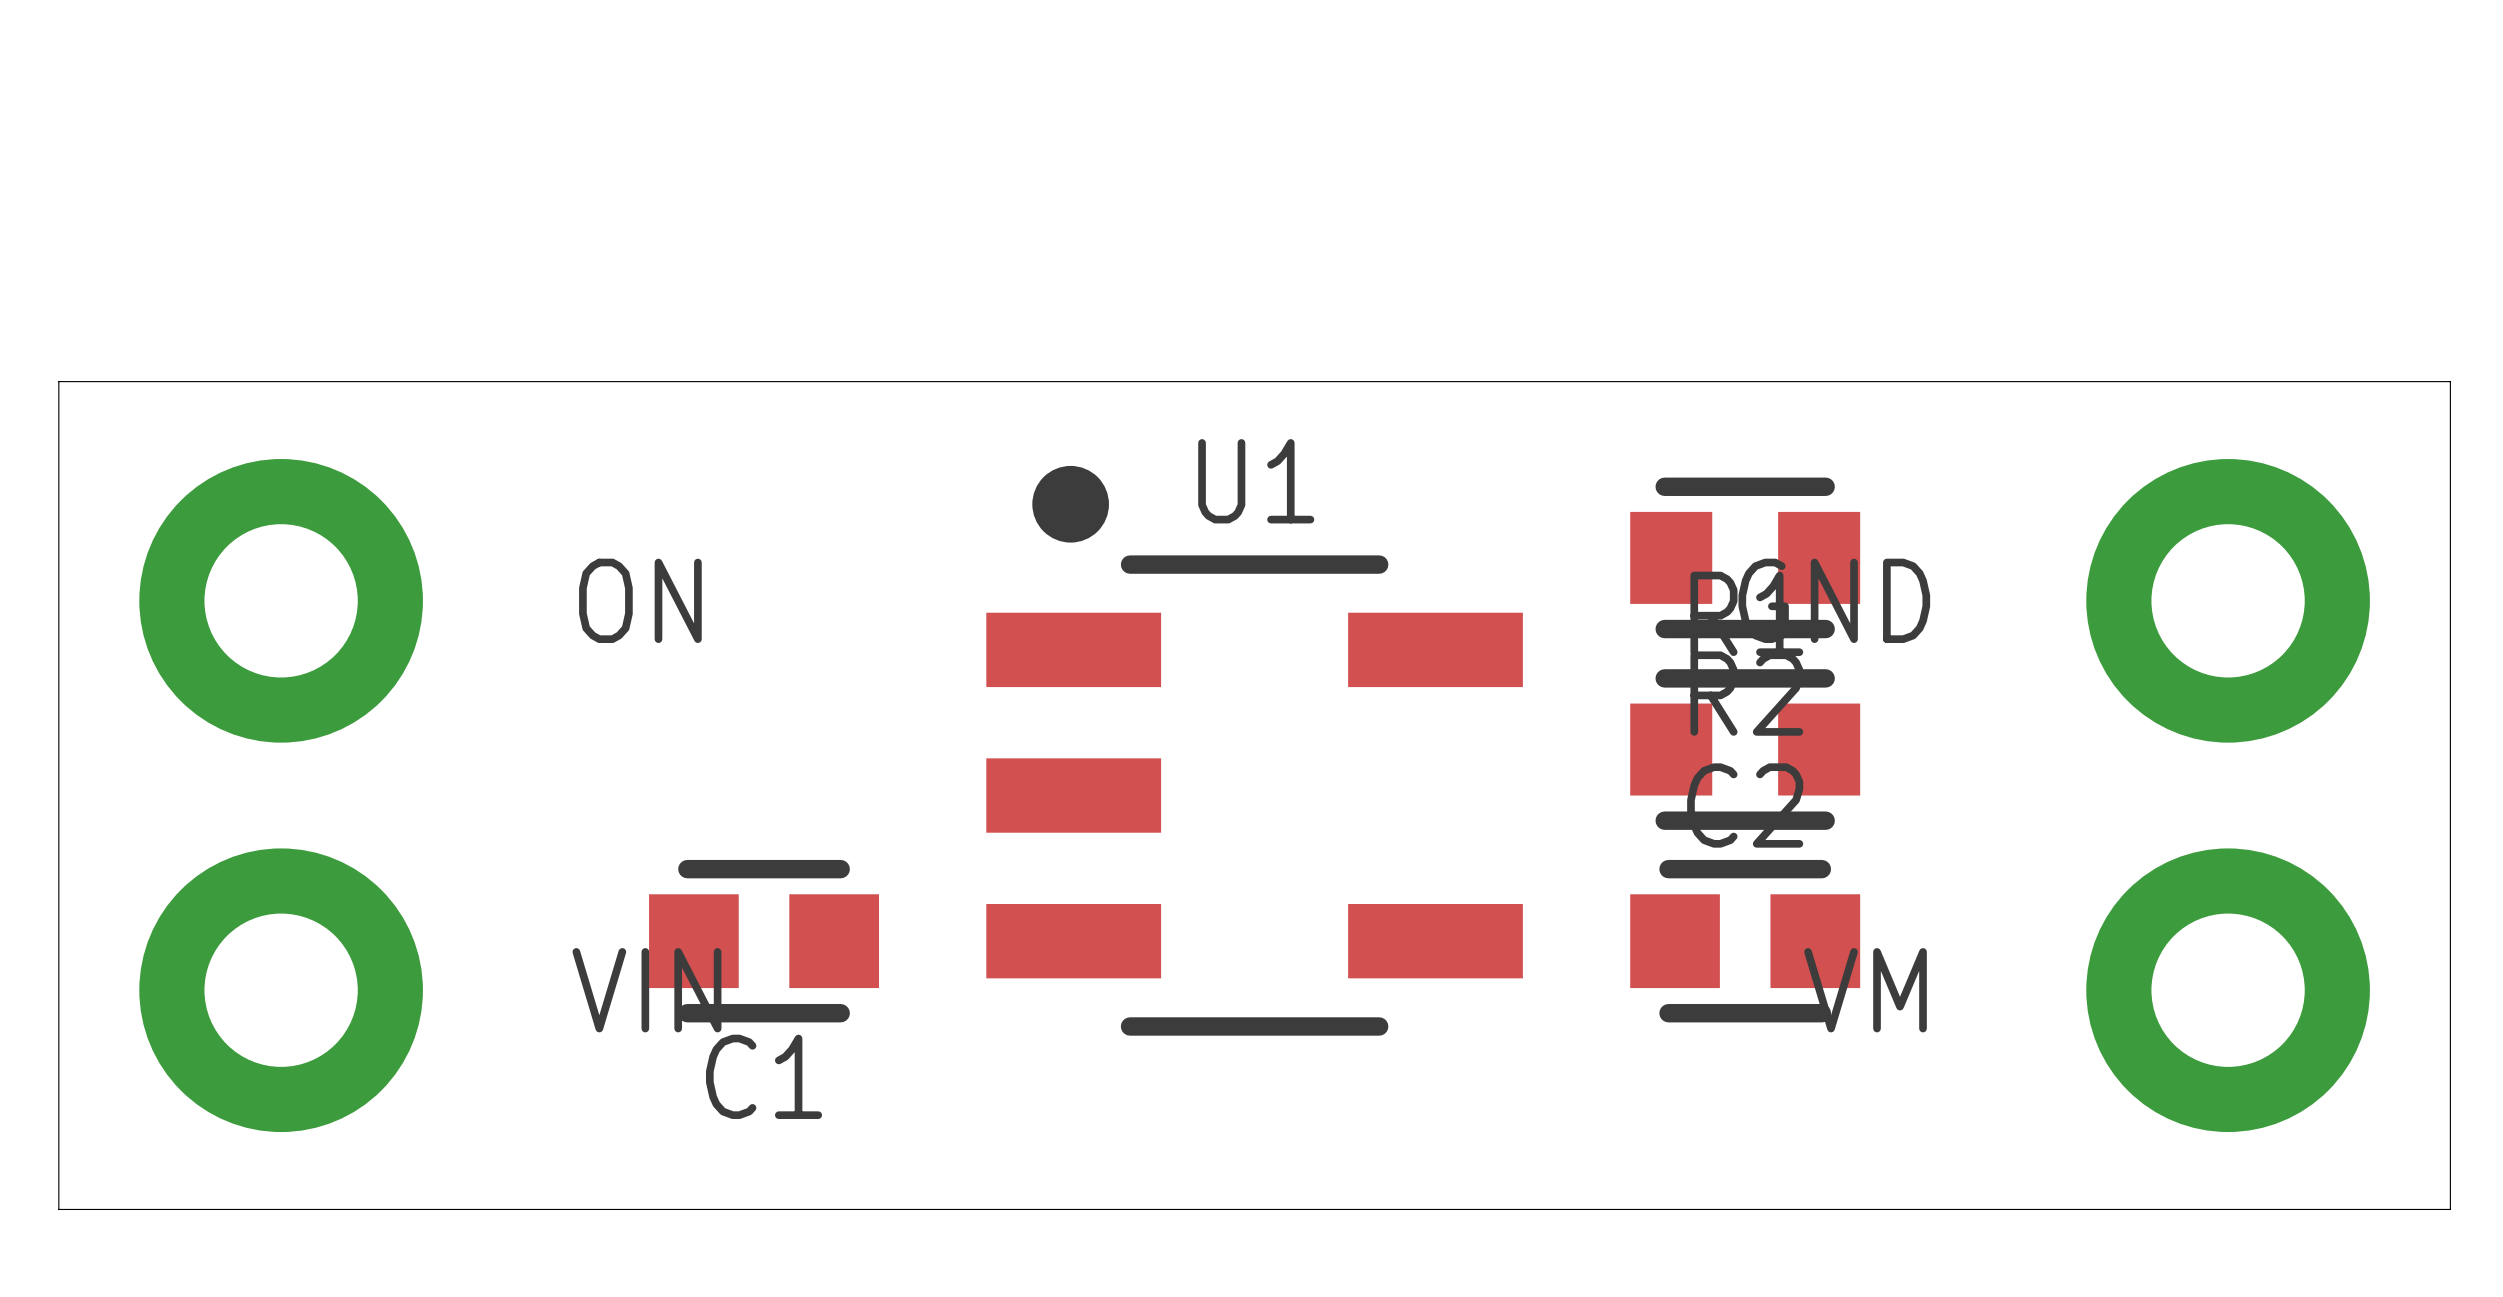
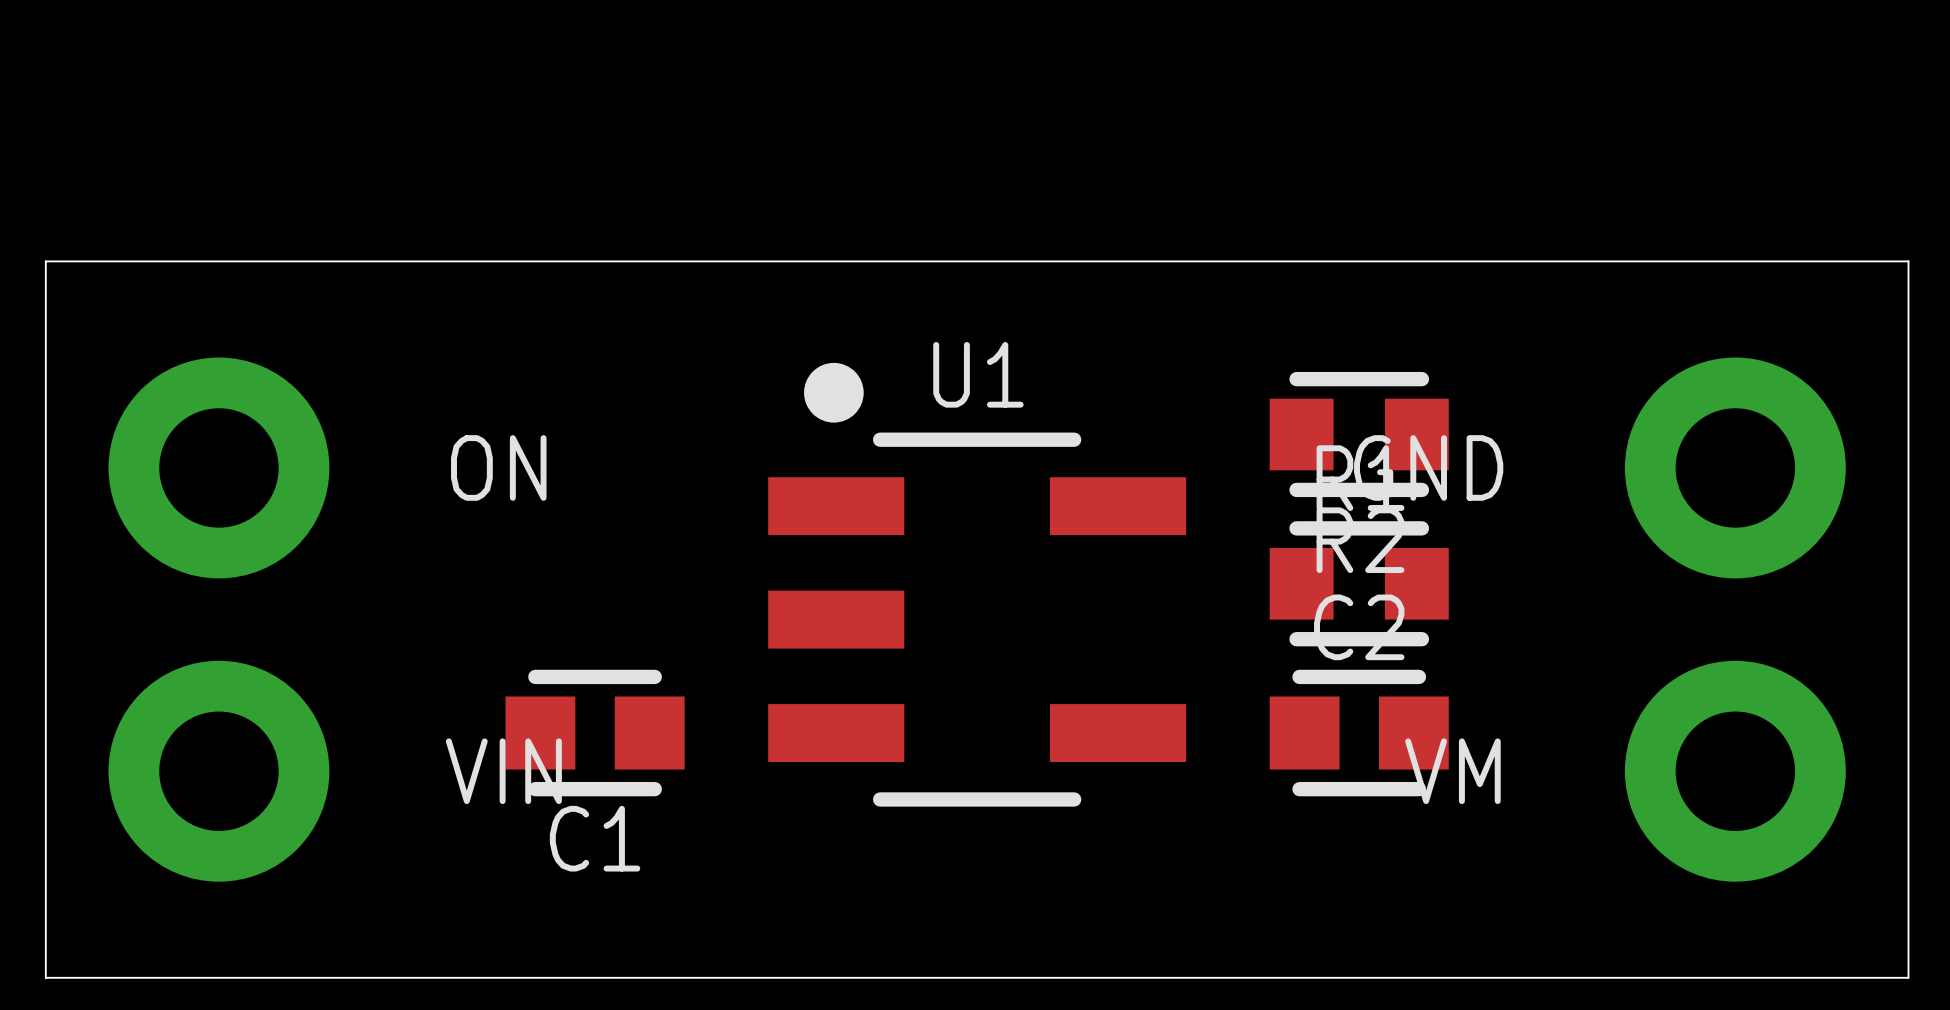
board edge: (58, 381) (2450, 381) -> (45, 297) (45, 261) (1908, 261) (1908, 297)
board edge: (58, 1209) (2450, 1209) -> (45, 941) (45, 977) (1908, 977) (1908, 941)

